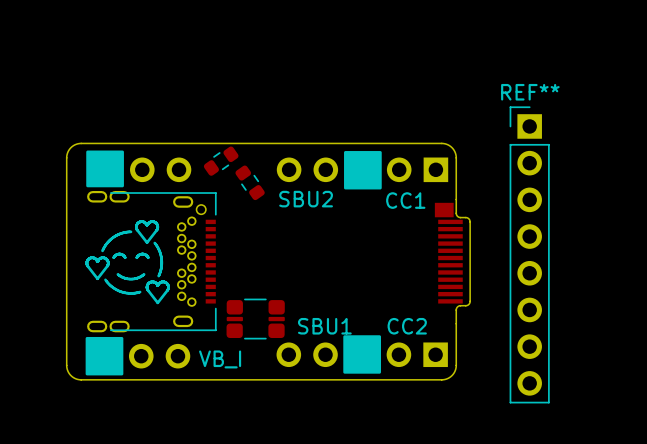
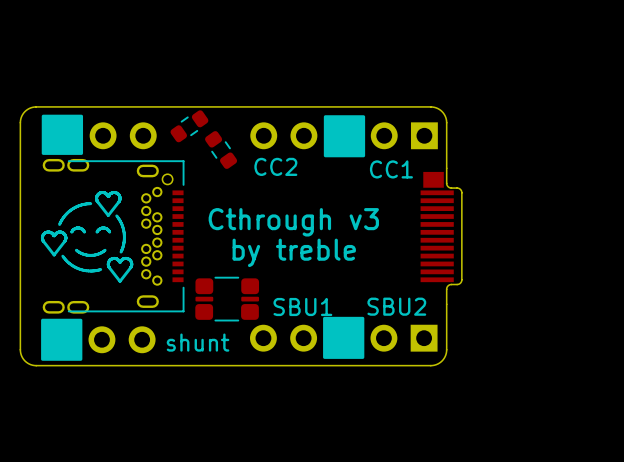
text: SBU2 (306, 199) -> CC2 (275, 166)
part footprint: [434, 199, 471, 325] -> [420, 167, 463, 305]
text: none -> Cthrough v3 (293, 222)
REF**: (529, 254) -> none
text: none -> by treble (294, 252)
text: CC2 (407, 326) -> SBU2 (396, 306)
text: VB_I (220, 359) -> shunt (198, 342)

